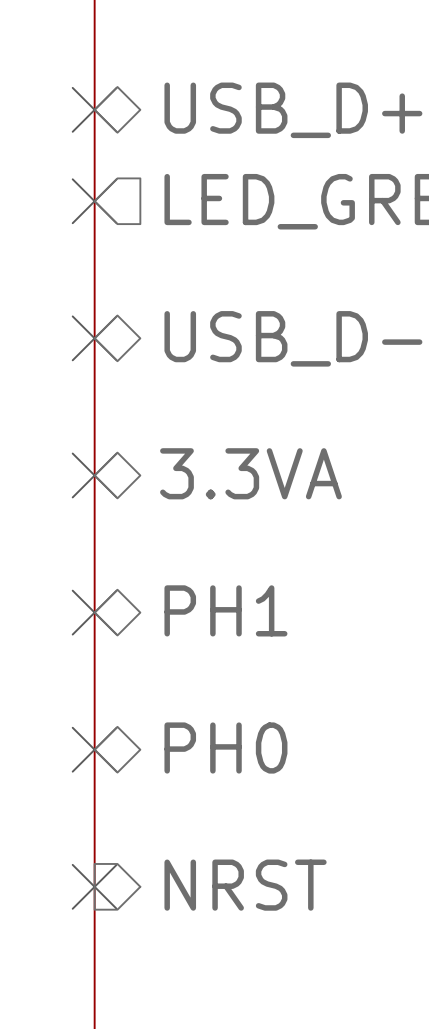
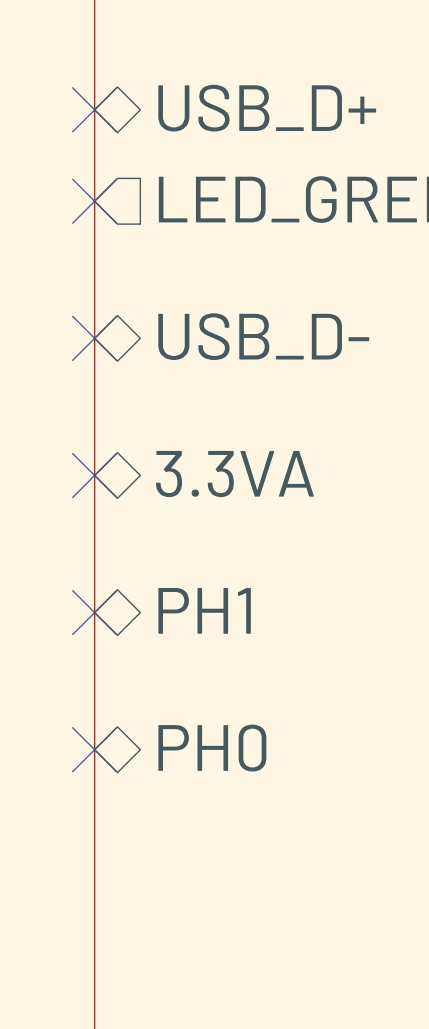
sheet pin: NRST (245, 885) -> none
no-connect mark: (94, 886) -> none

